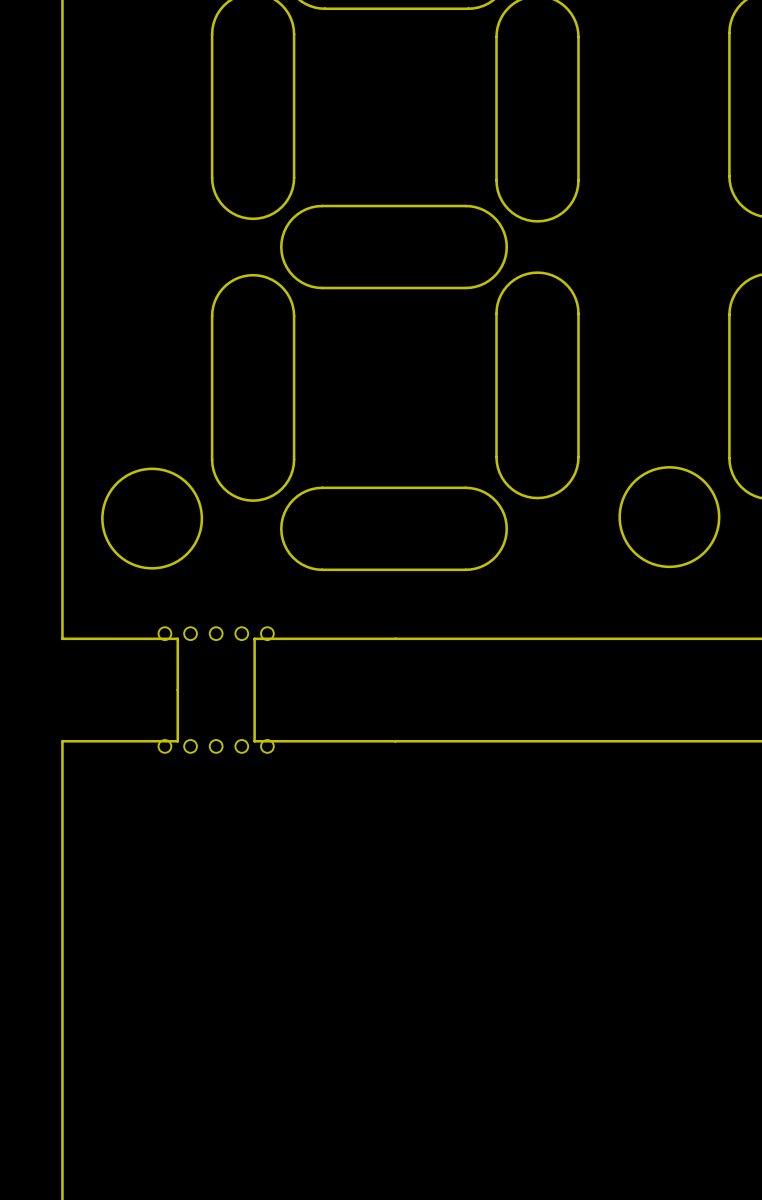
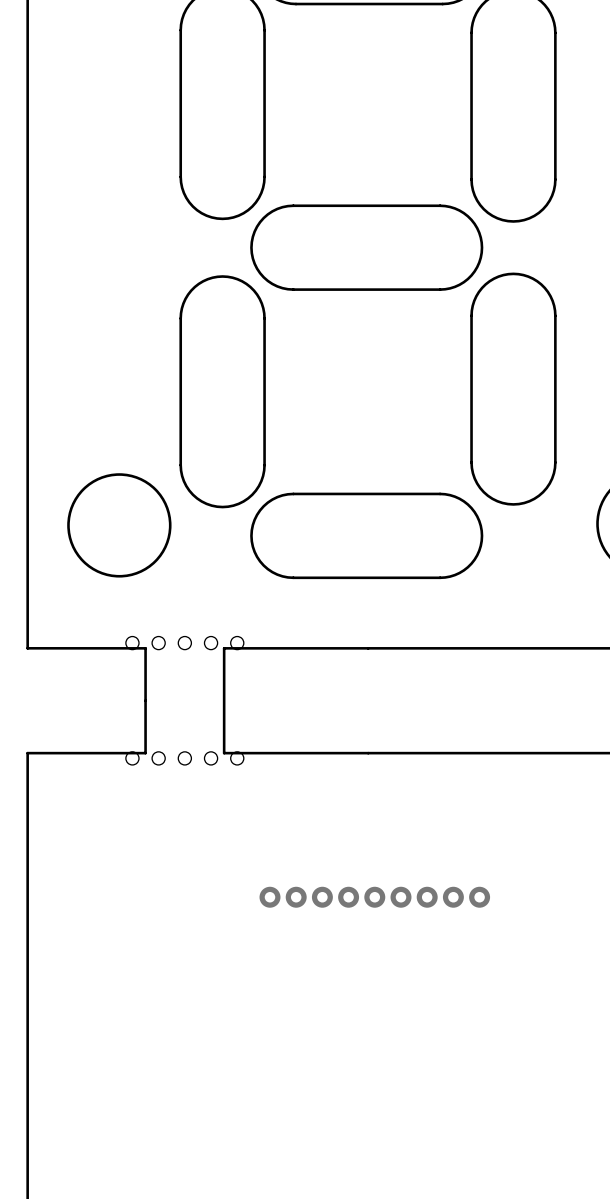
via: none -> (270, 897)
via: none -> (296, 897)
via: none -> (322, 897)
via: none -> (348, 897)
via: none -> (374, 897)
via: none -> (401, 897)
via: none -> (427, 897)
via: none -> (453, 897)
via: none -> (479, 897)

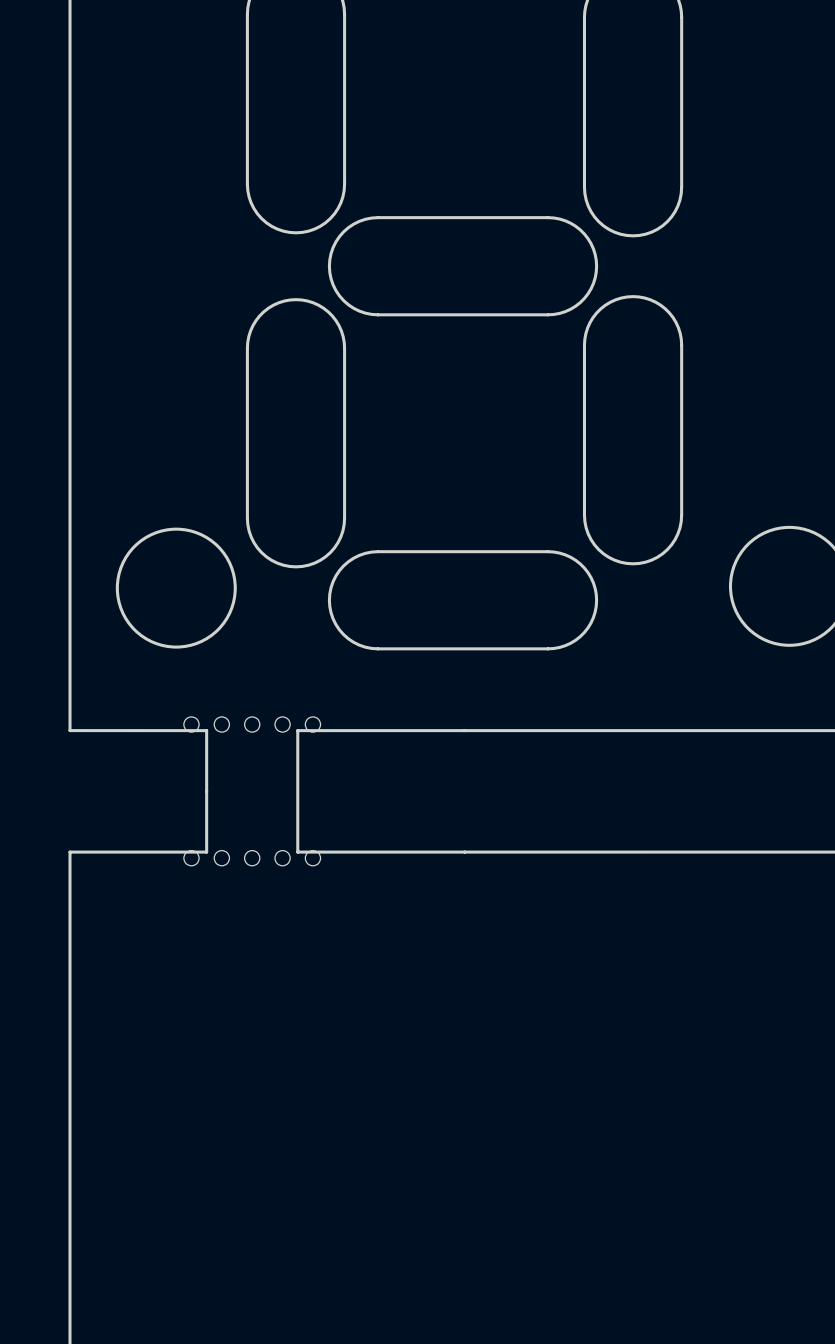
via: (270, 897) -> none
via: (296, 897) -> none
via: (322, 897) -> none
via: (348, 897) -> none
via: (374, 897) -> none
via: (401, 897) -> none
via: (427, 897) -> none
via: (453, 897) -> none
via: (479, 897) -> none

